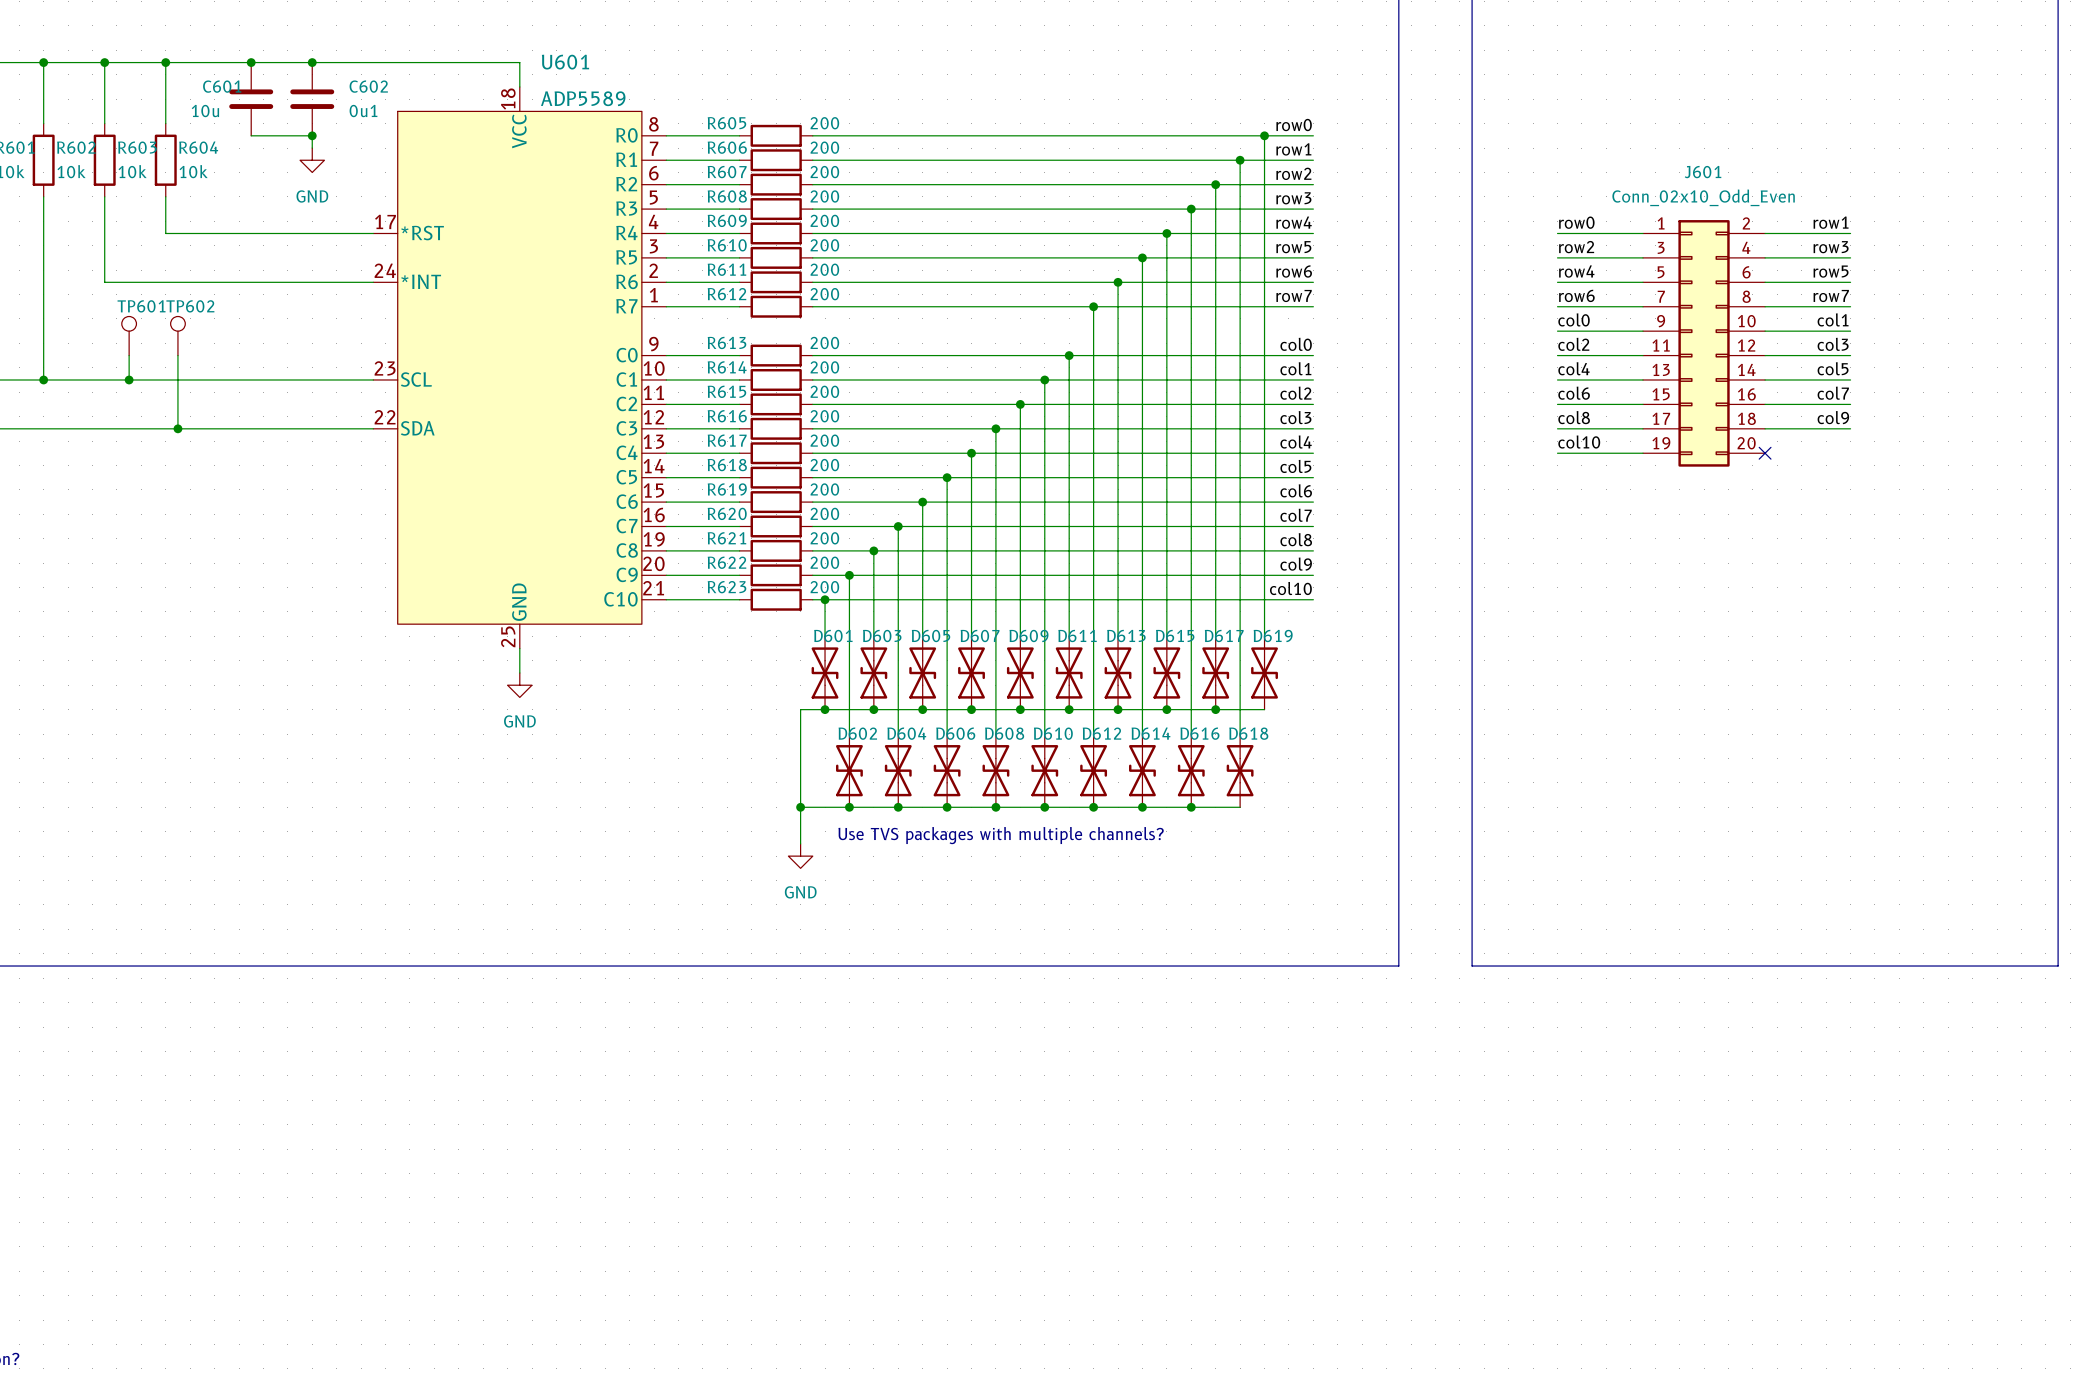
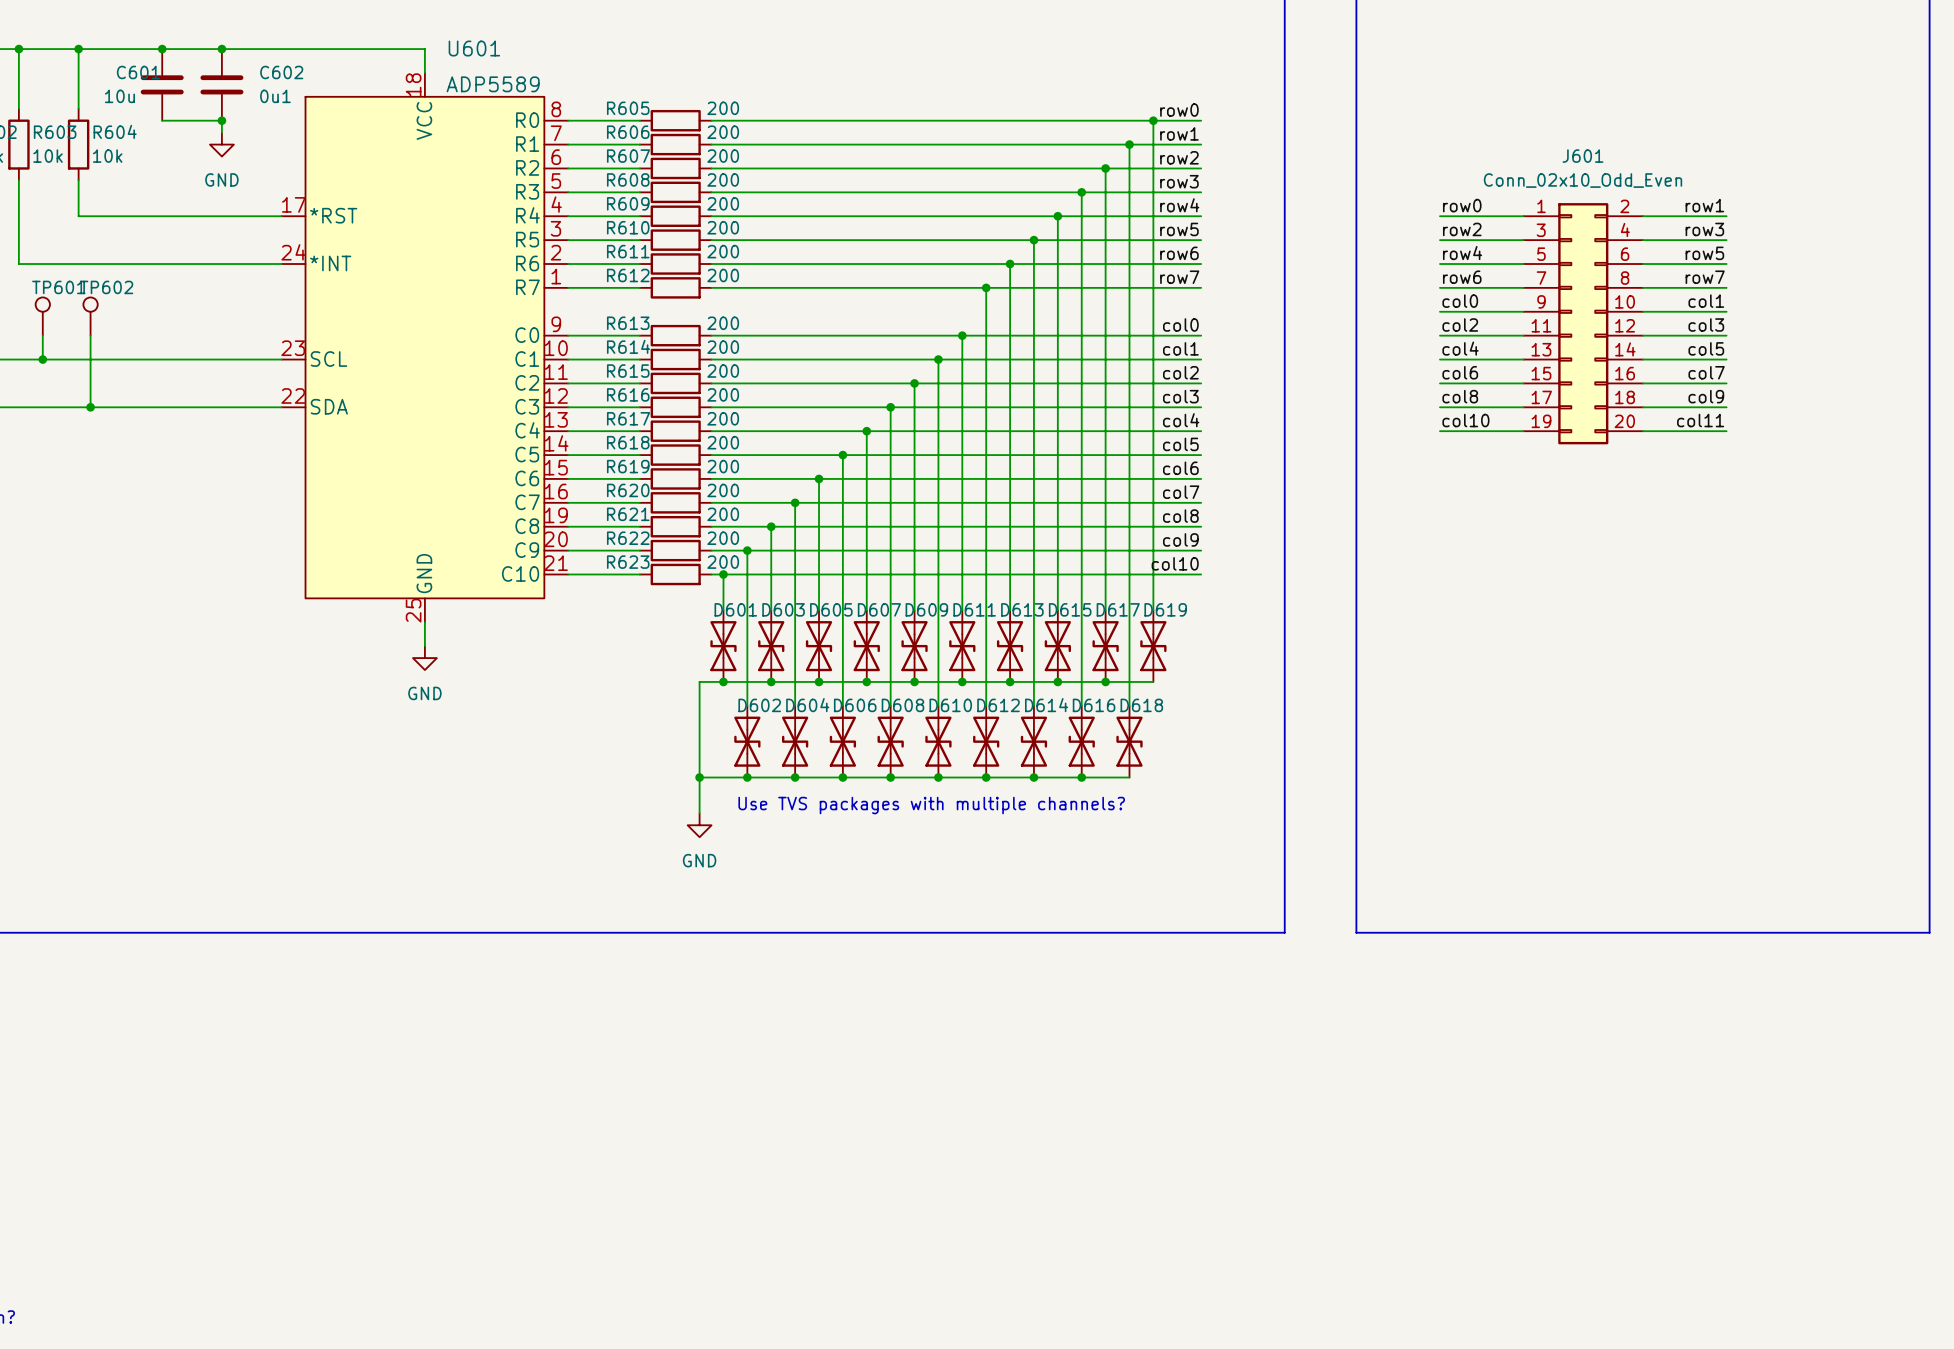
label: none -> col11 (1700, 420)
wire: none -> (1642, 431) (1726, 431)
no-connect mark: (1765, 453) -> none

